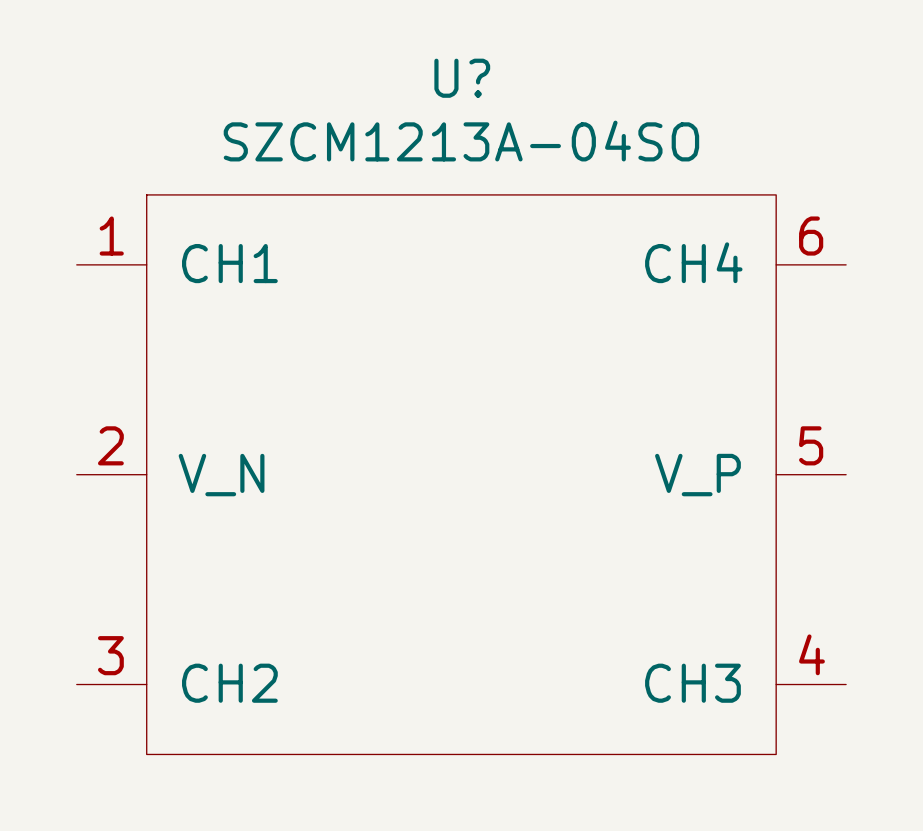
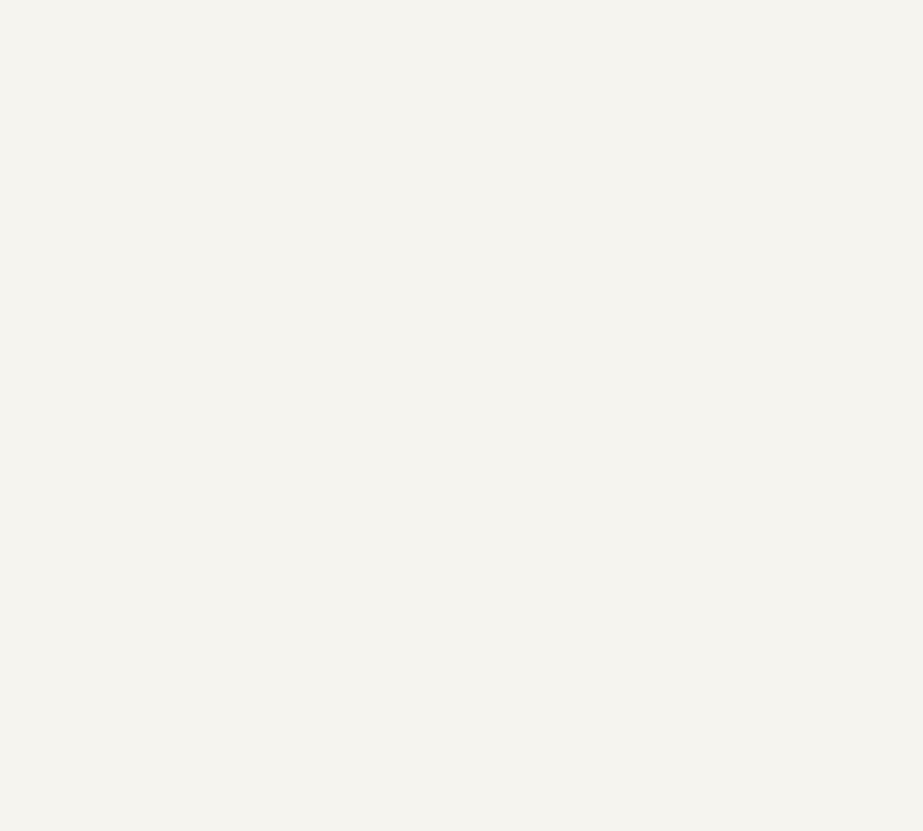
U?: SZCM1213A-04SO (461, 474) -> none

